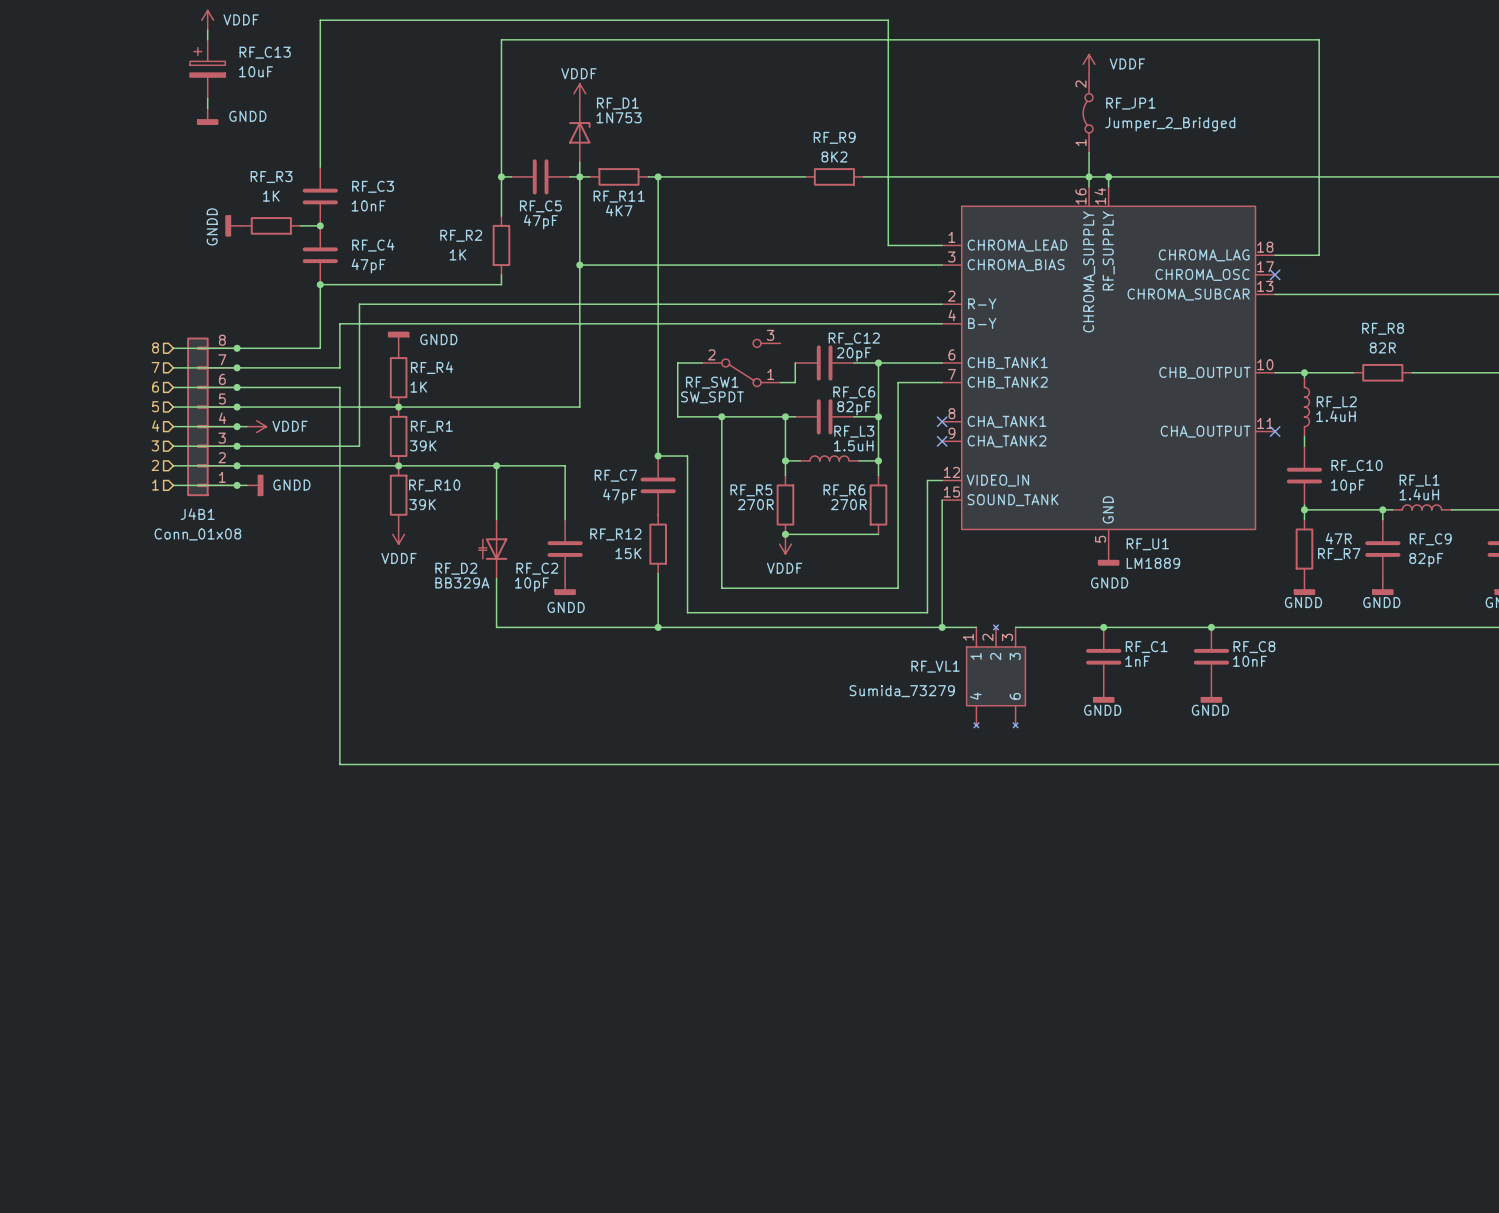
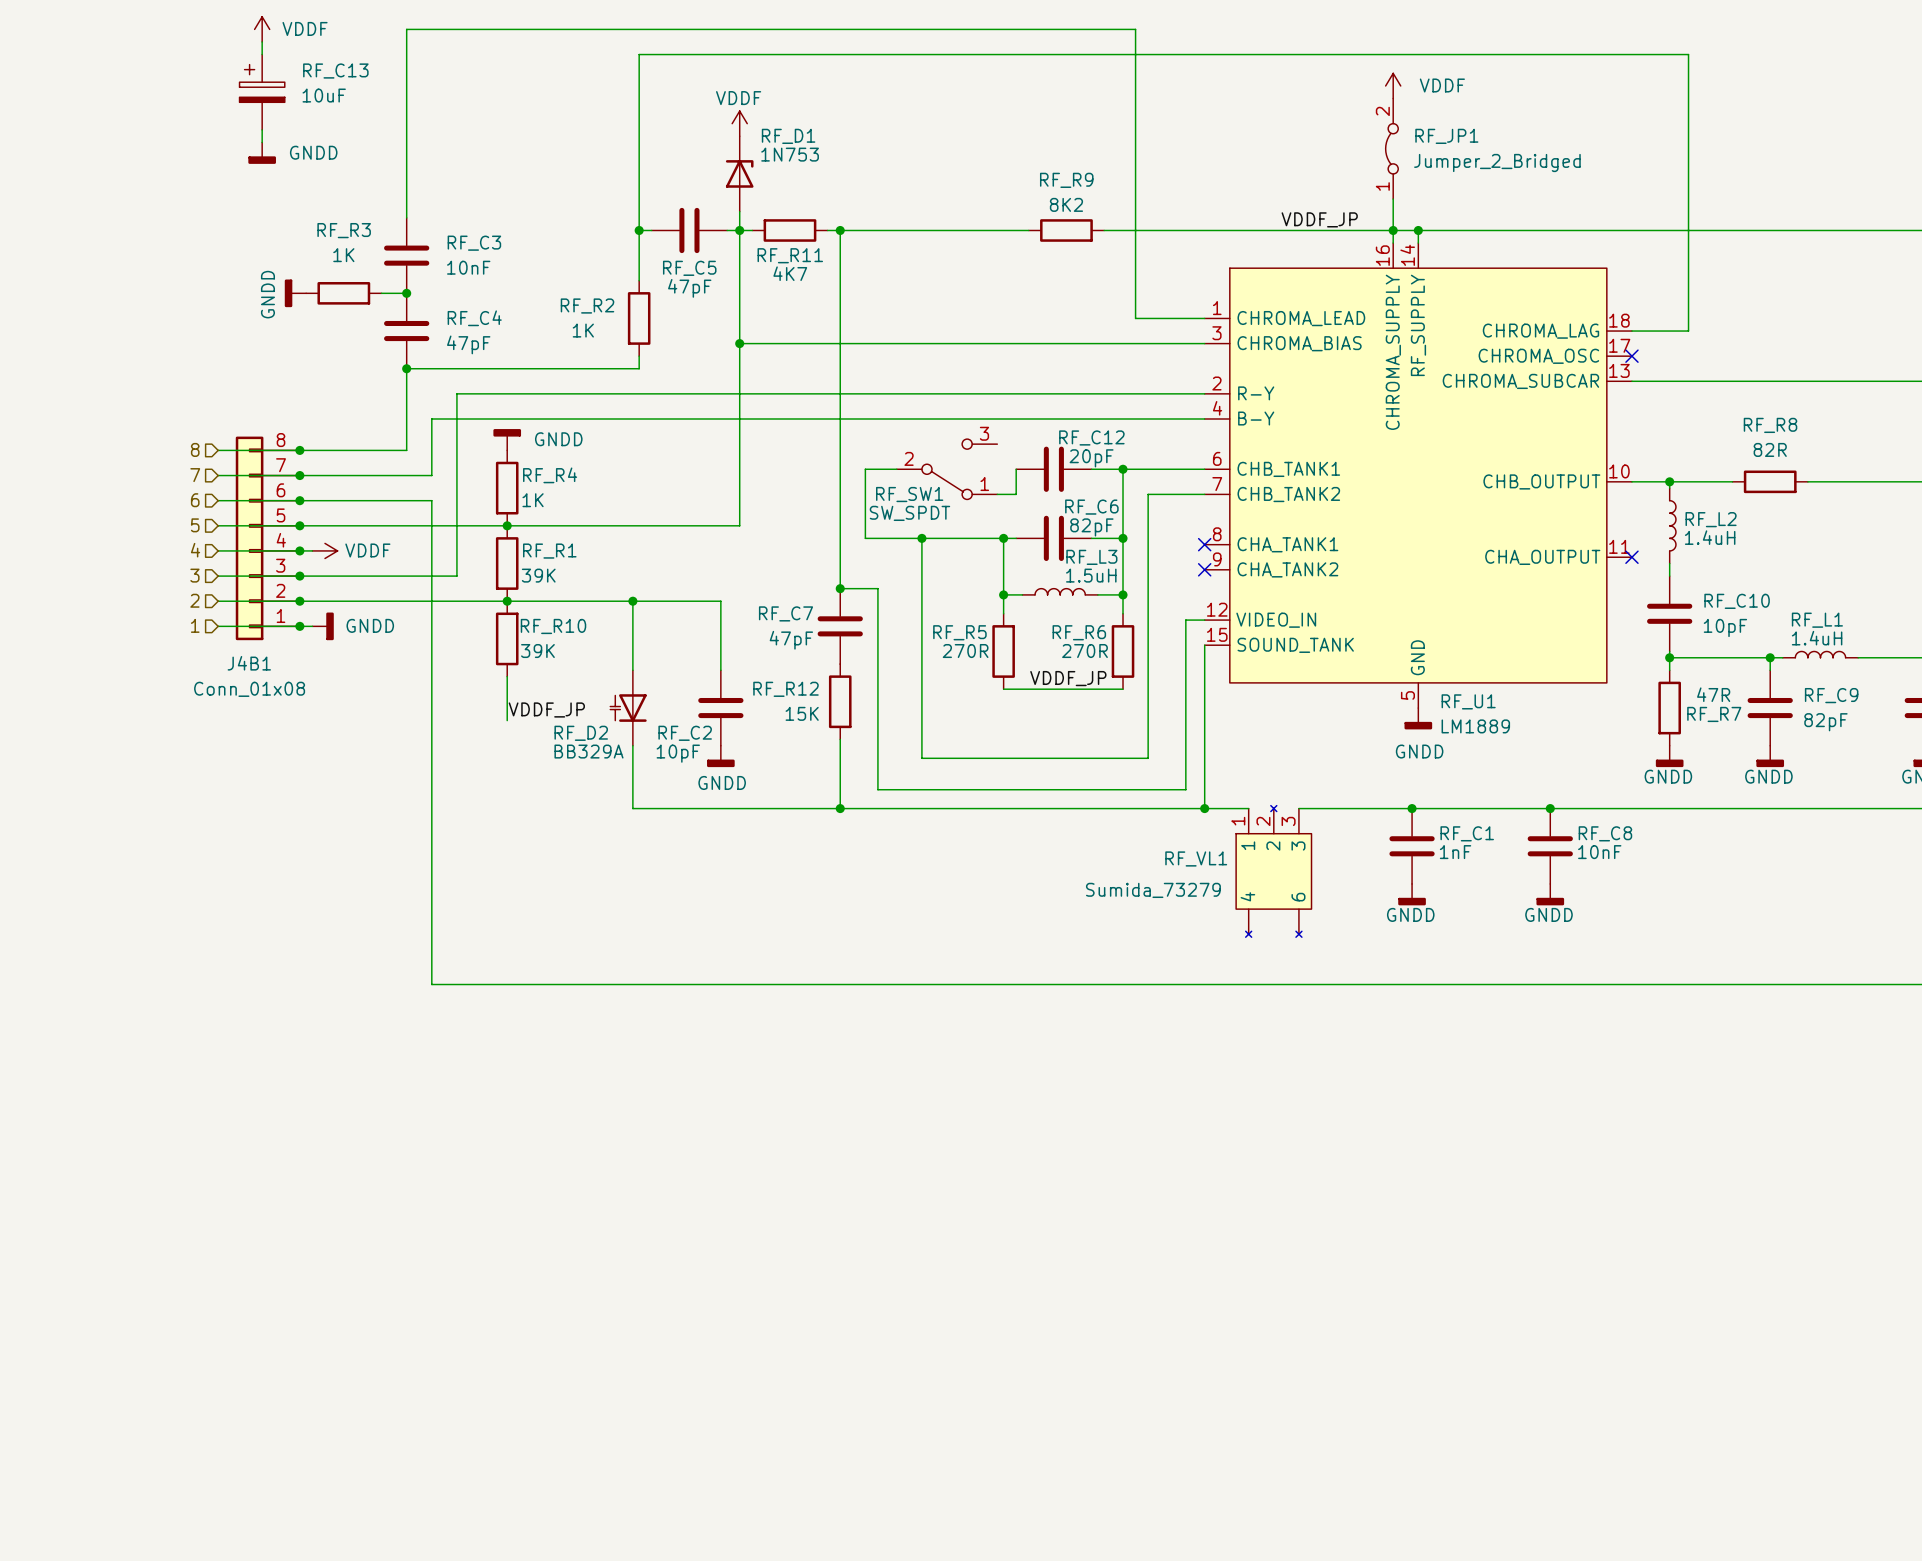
label: none -> VDDF_JP (1319, 219)
label: none -> VDDF_JP (1068, 678)
power symbol: VDDF (398, 534) -> none
junction: (785, 534) -> none
power symbol: VDDF (785, 544) -> none
label: none -> VDDF_JP (546, 709)

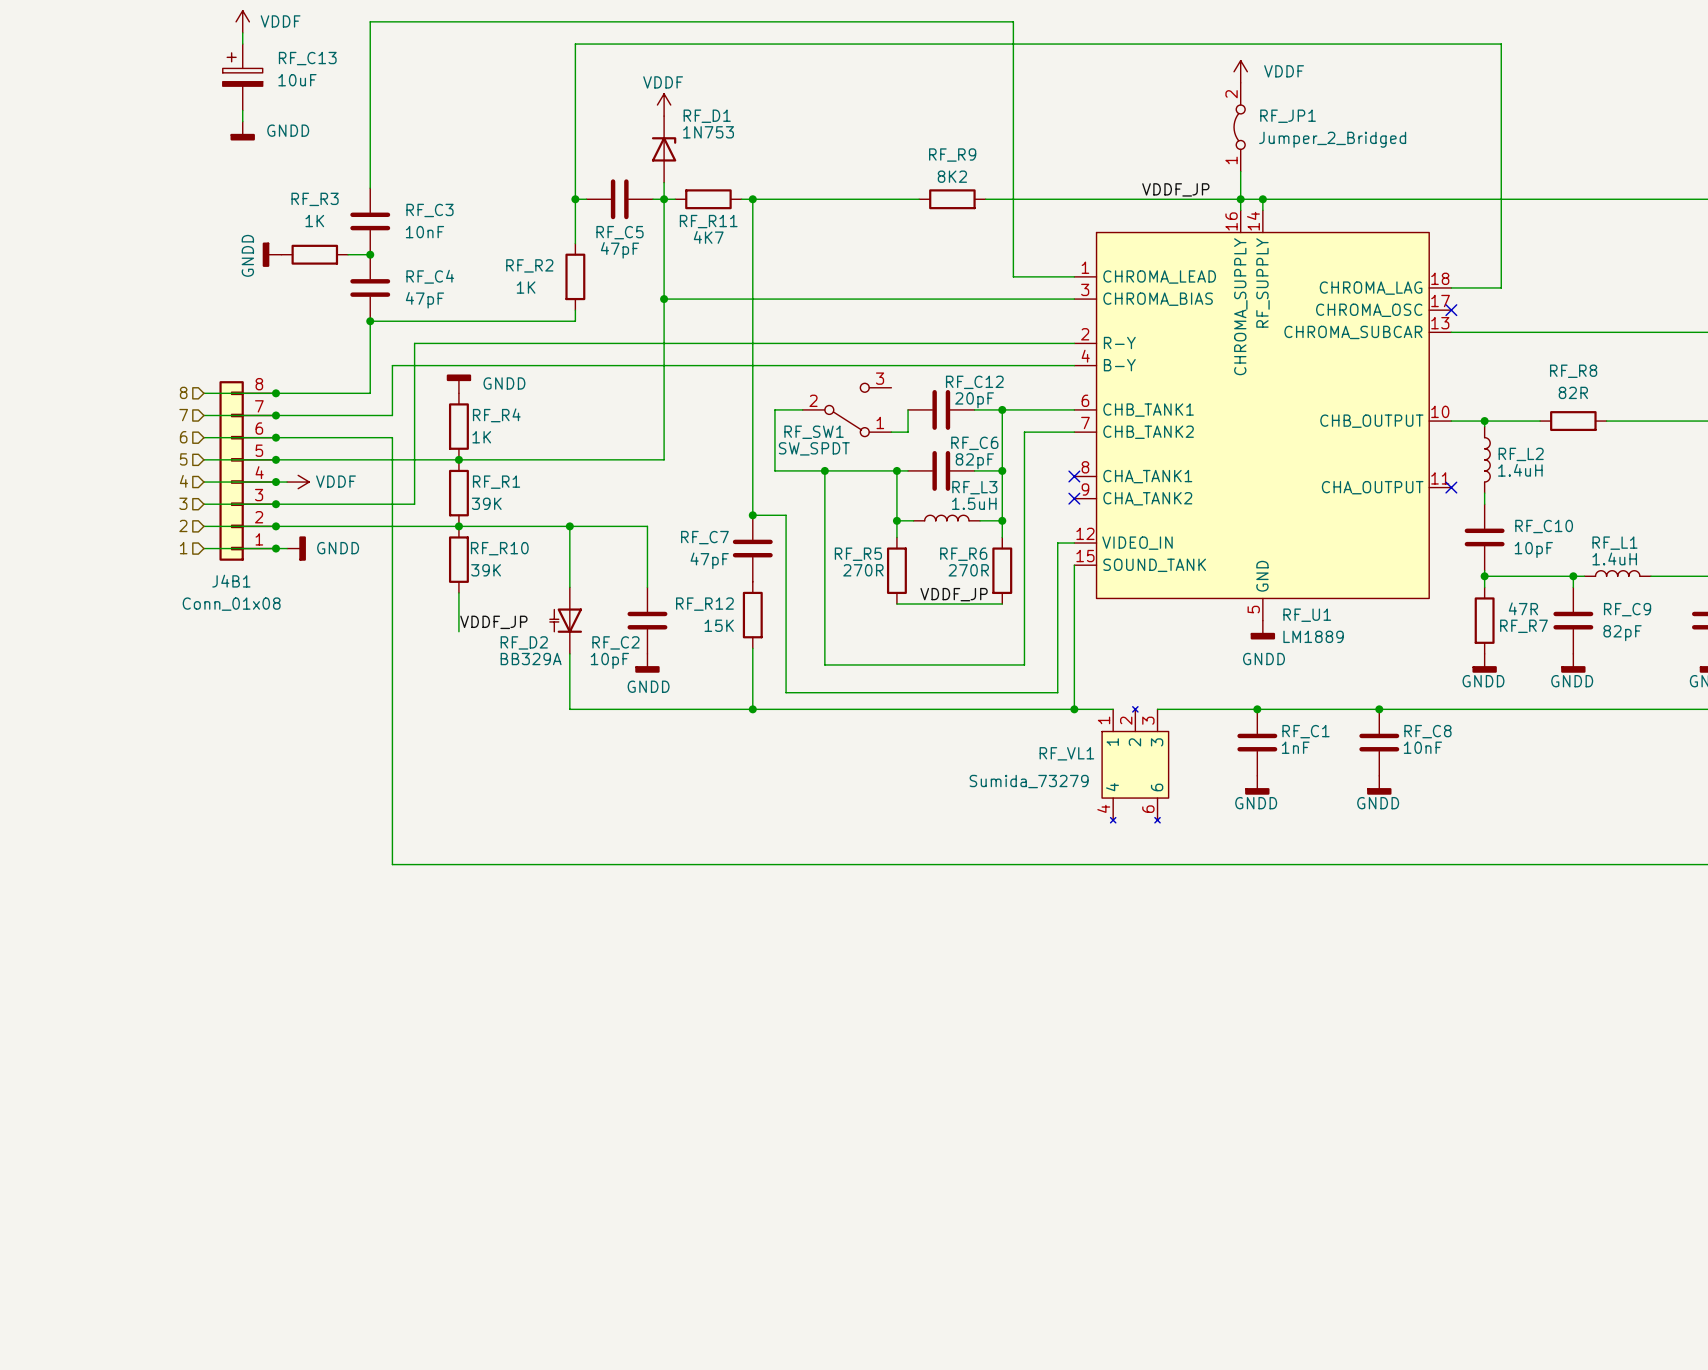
RF_VL1 pin number: none -> 4 (1103, 808)
RF_VL1 pin number: none -> 6 (1148, 809)

